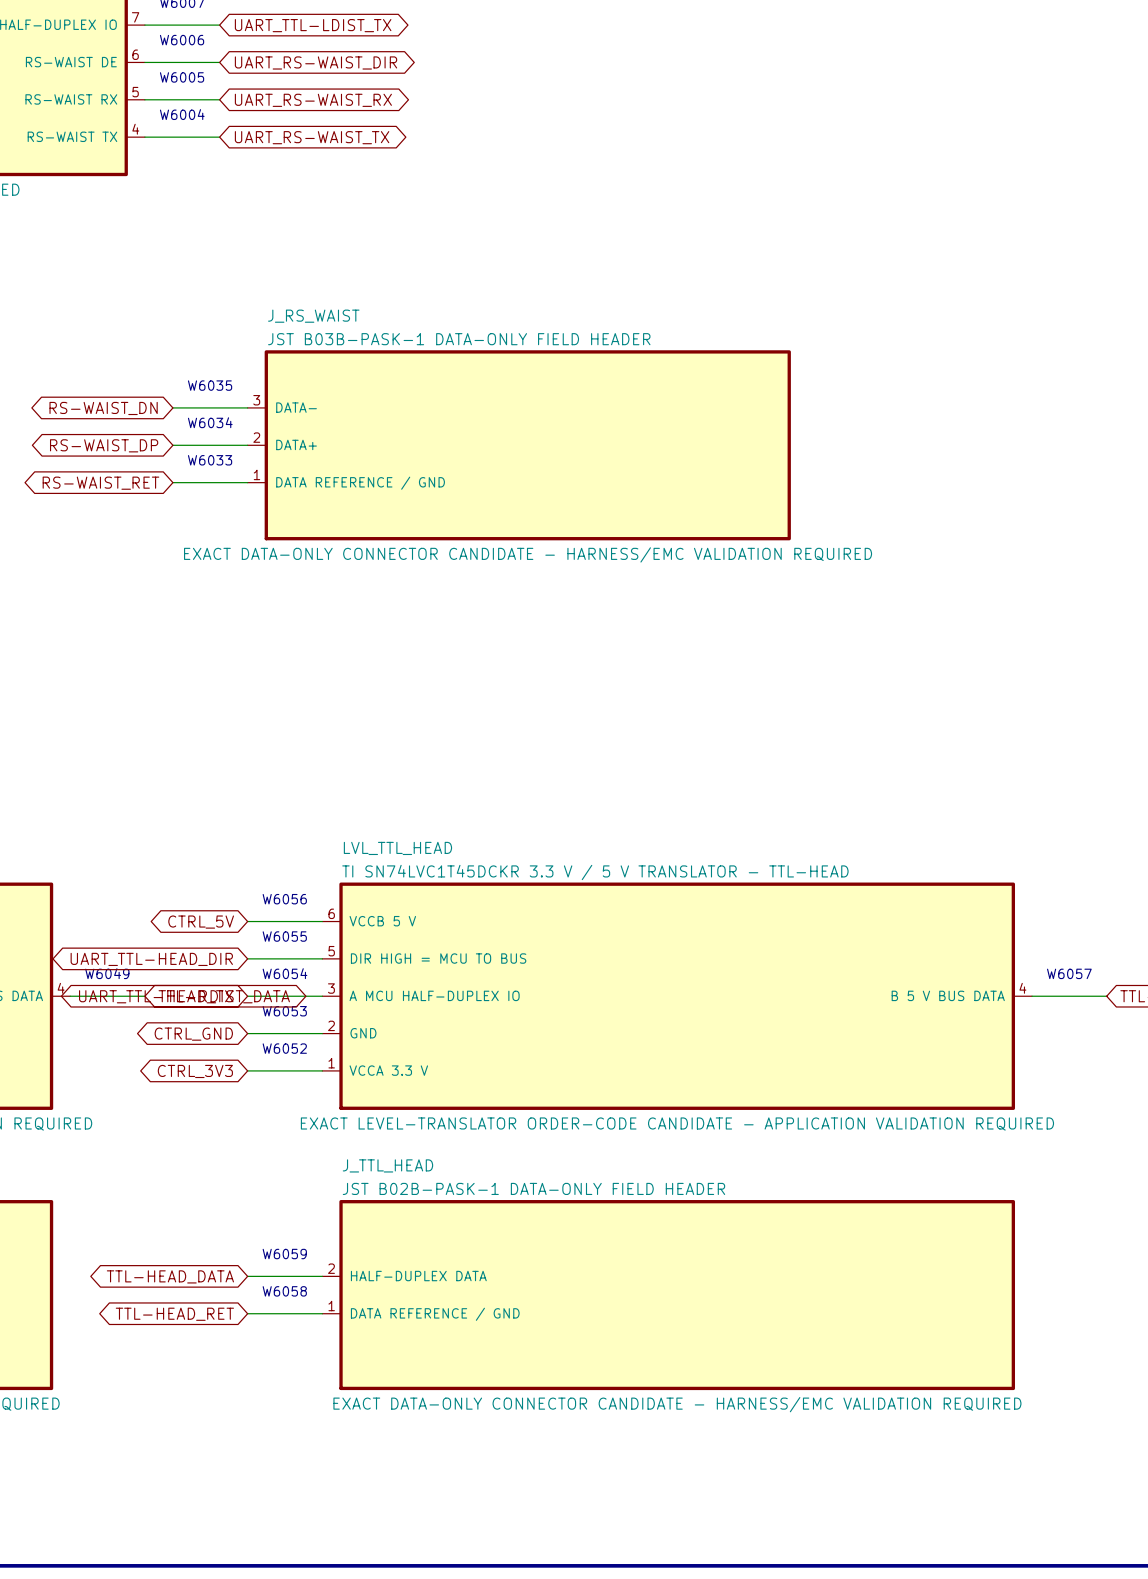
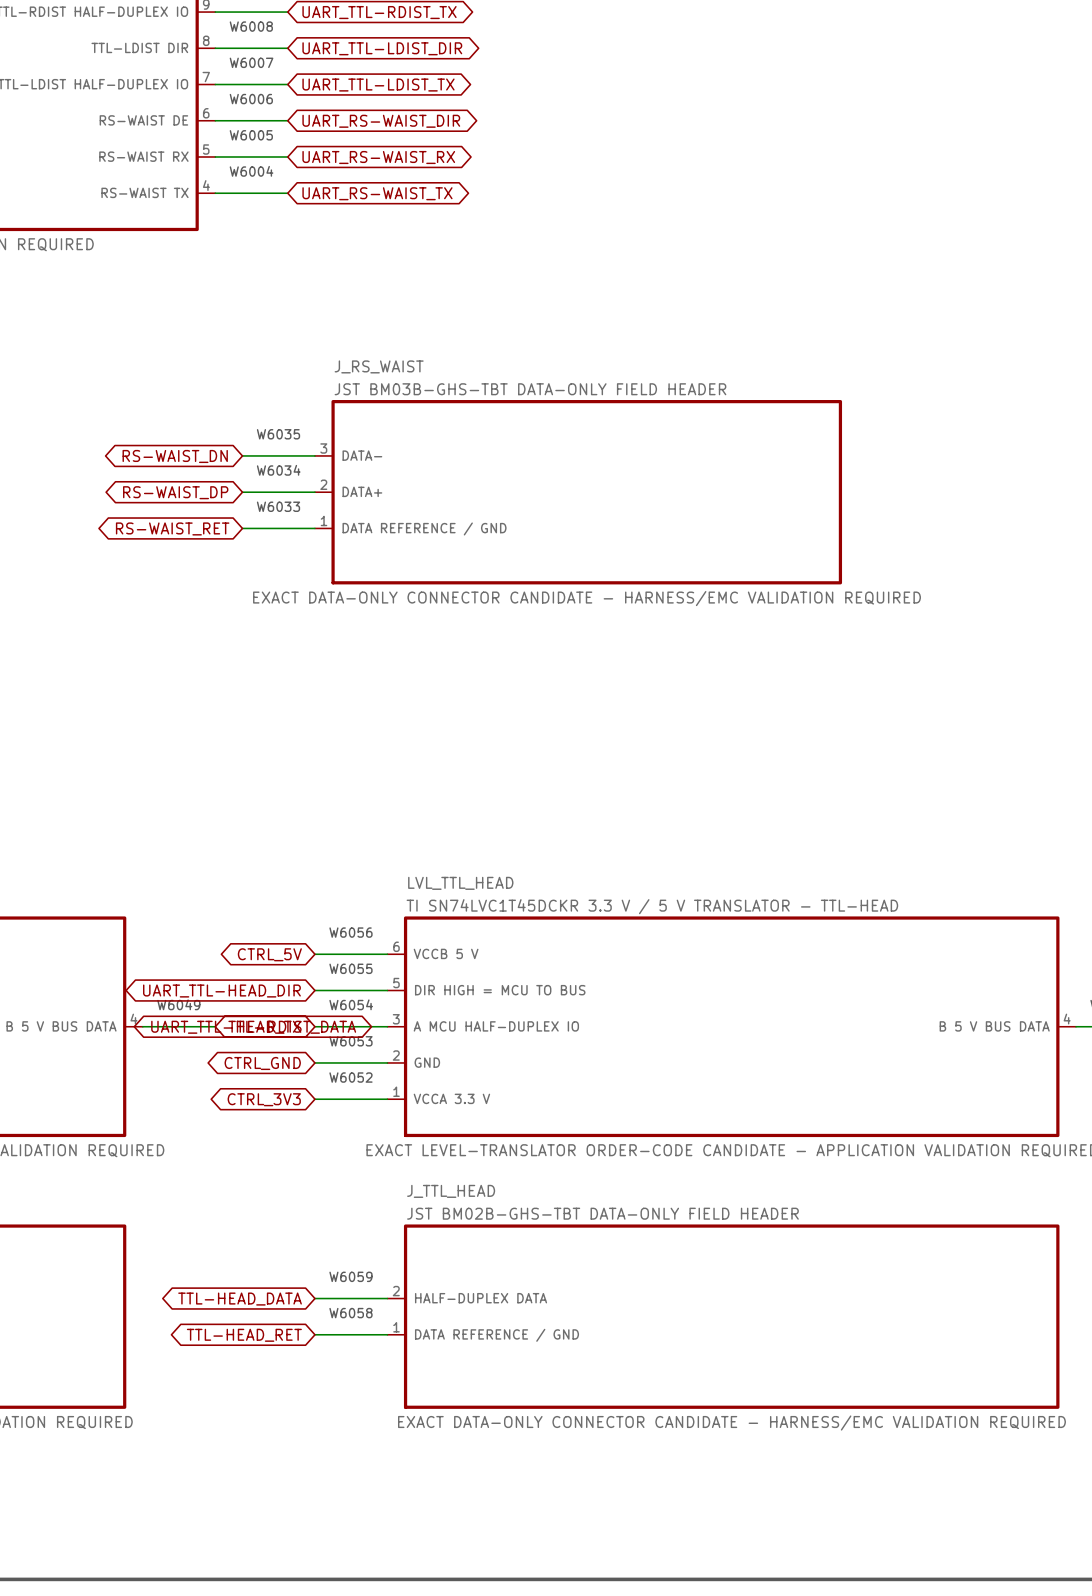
J_RS_WAIST text: JST B03B-PASK-1 DATA-ONLY FIELD HEADER (459, 339) -> JST BM03B-GHS-TBT DATA-ONLY FIELD HEADER (530, 389)
J_TTL_HEAD text: JST B02B-PASK-1 DATA-ONLY FIELD HEADER (533, 1188) -> JST BM02B-GHS-TBT DATA-ONLY FIELD HEADER (602, 1213)

